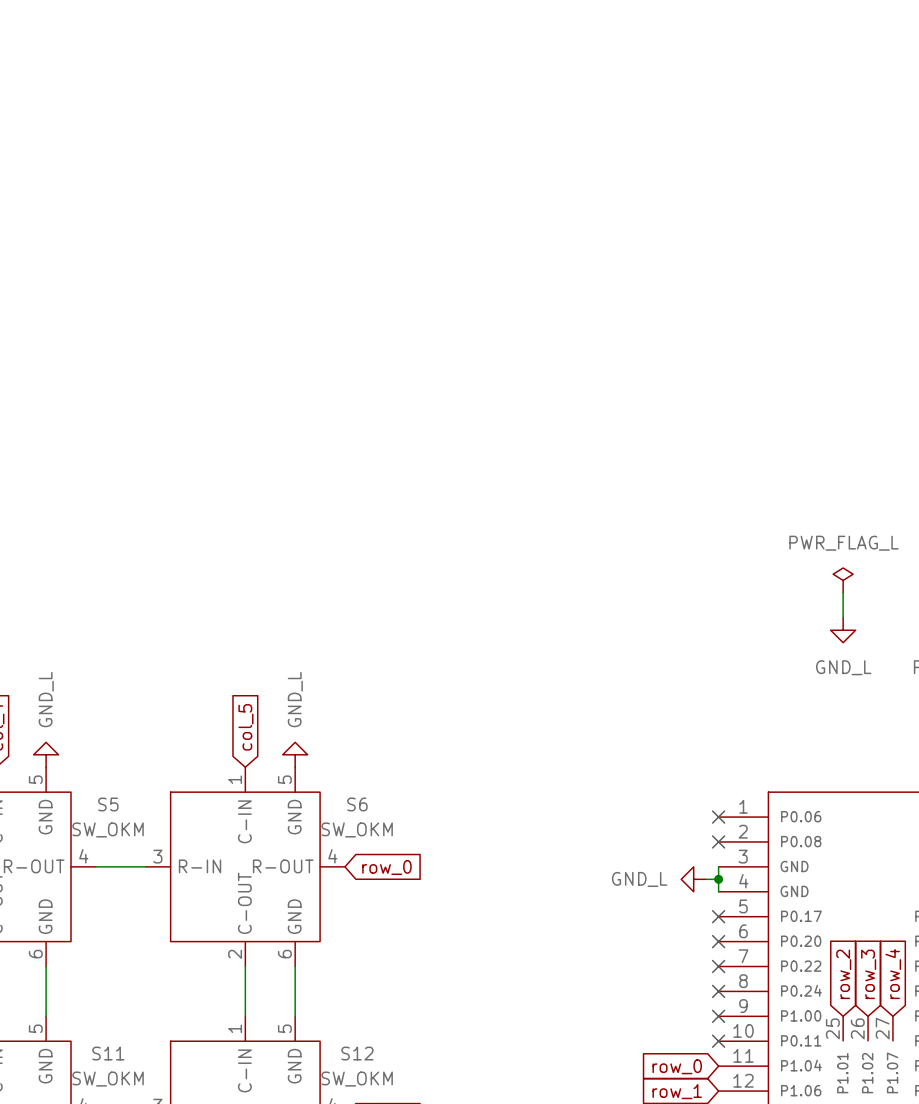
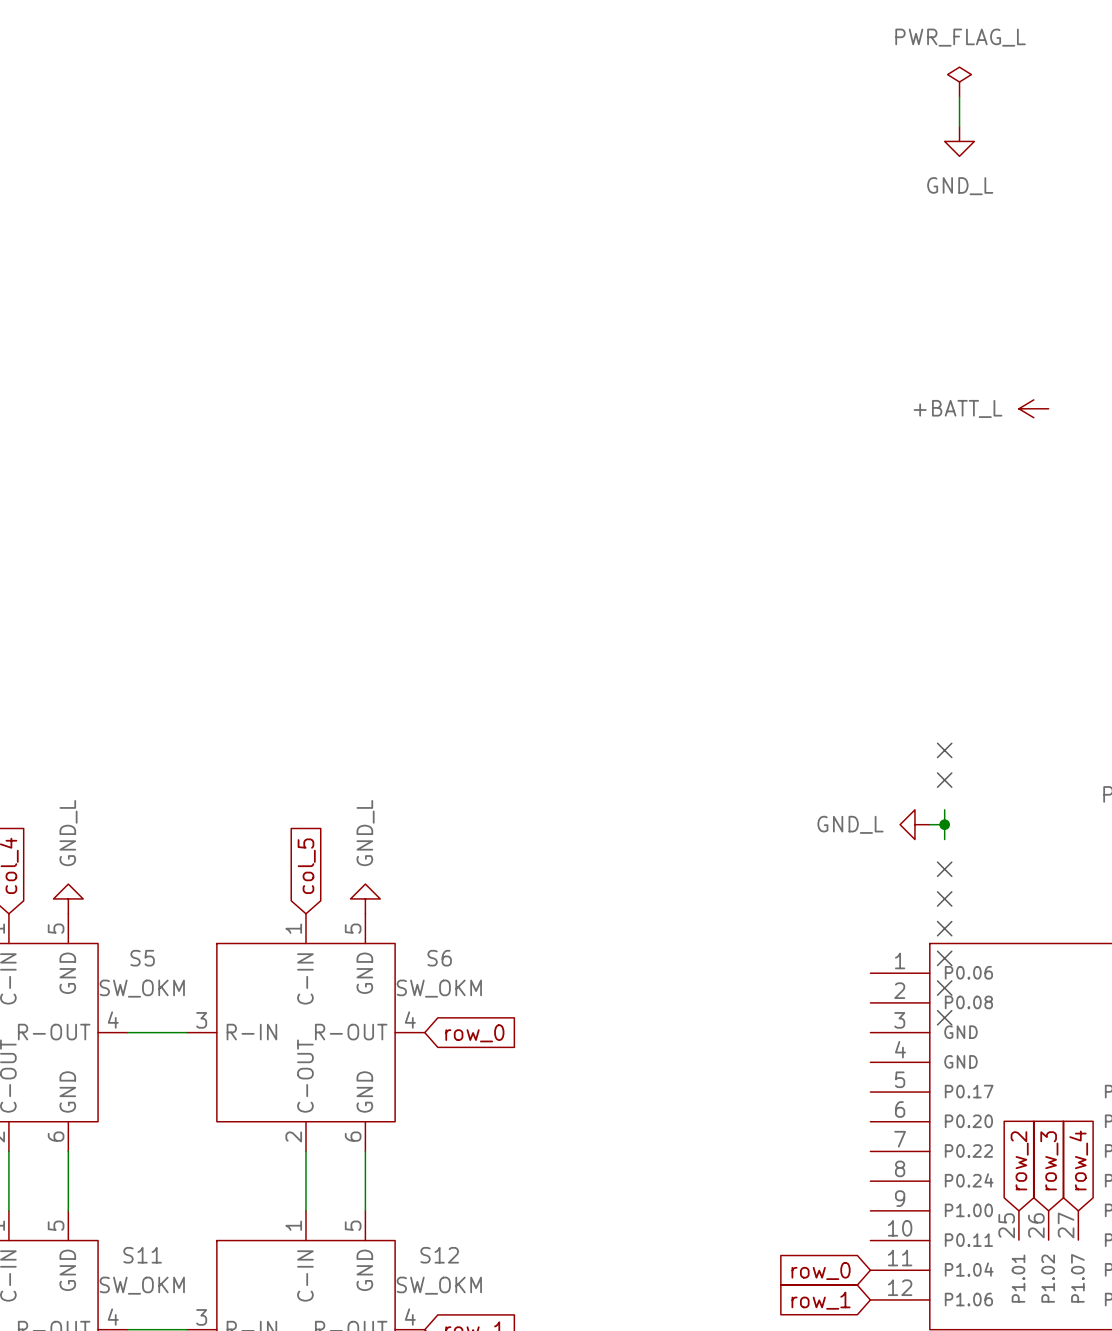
power symbol: none -> PWR_FLAG_L (959, 82)
wire: none -> (959, 96) (959, 126)
power symbol: none -> GND_L (959, 141)
power symbol: none -> +BATT_L (1033, 408)
power symbol: PWR_FLAG_L (843, 580) -> none
wire: (843, 592) (843, 617) -> none
no-connect mark: none -> (944, 750)
power symbol: GND_L (843, 630) -> none
no-connect mark: none -> (944, 780)
power symbol: none -> GND_L (914, 824)
junction: none -> (944, 824)
no-connect mark: none -> (944, 869)
no-connect mark: none -> (944, 898)
no-connect mark: none -> (944, 928)
no-connect mark: none -> (944, 958)
no-connect mark: (718, 817) -> none
no-connect mark: none -> (944, 988)
no-connect mark: (718, 841) -> none
no-connect mark: none -> (944, 1017)
wire: (718, 866) (718, 891) -> (944, 809) (944, 839)
power symbol: GND_L (693, 879) -> none
wire: (706, 879) (718, 879) -> (929, 824) (944, 824)
junction: (718, 879) -> none
no-connect mark: (718, 916) -> none
no-connect mark: (718, 941) -> none
no-connect mark: (718, 966) -> none
no-connect mark: (718, 991) -> none
no-connect mark: (718, 1016) -> none
no-connect mark: (718, 1041) -> none

